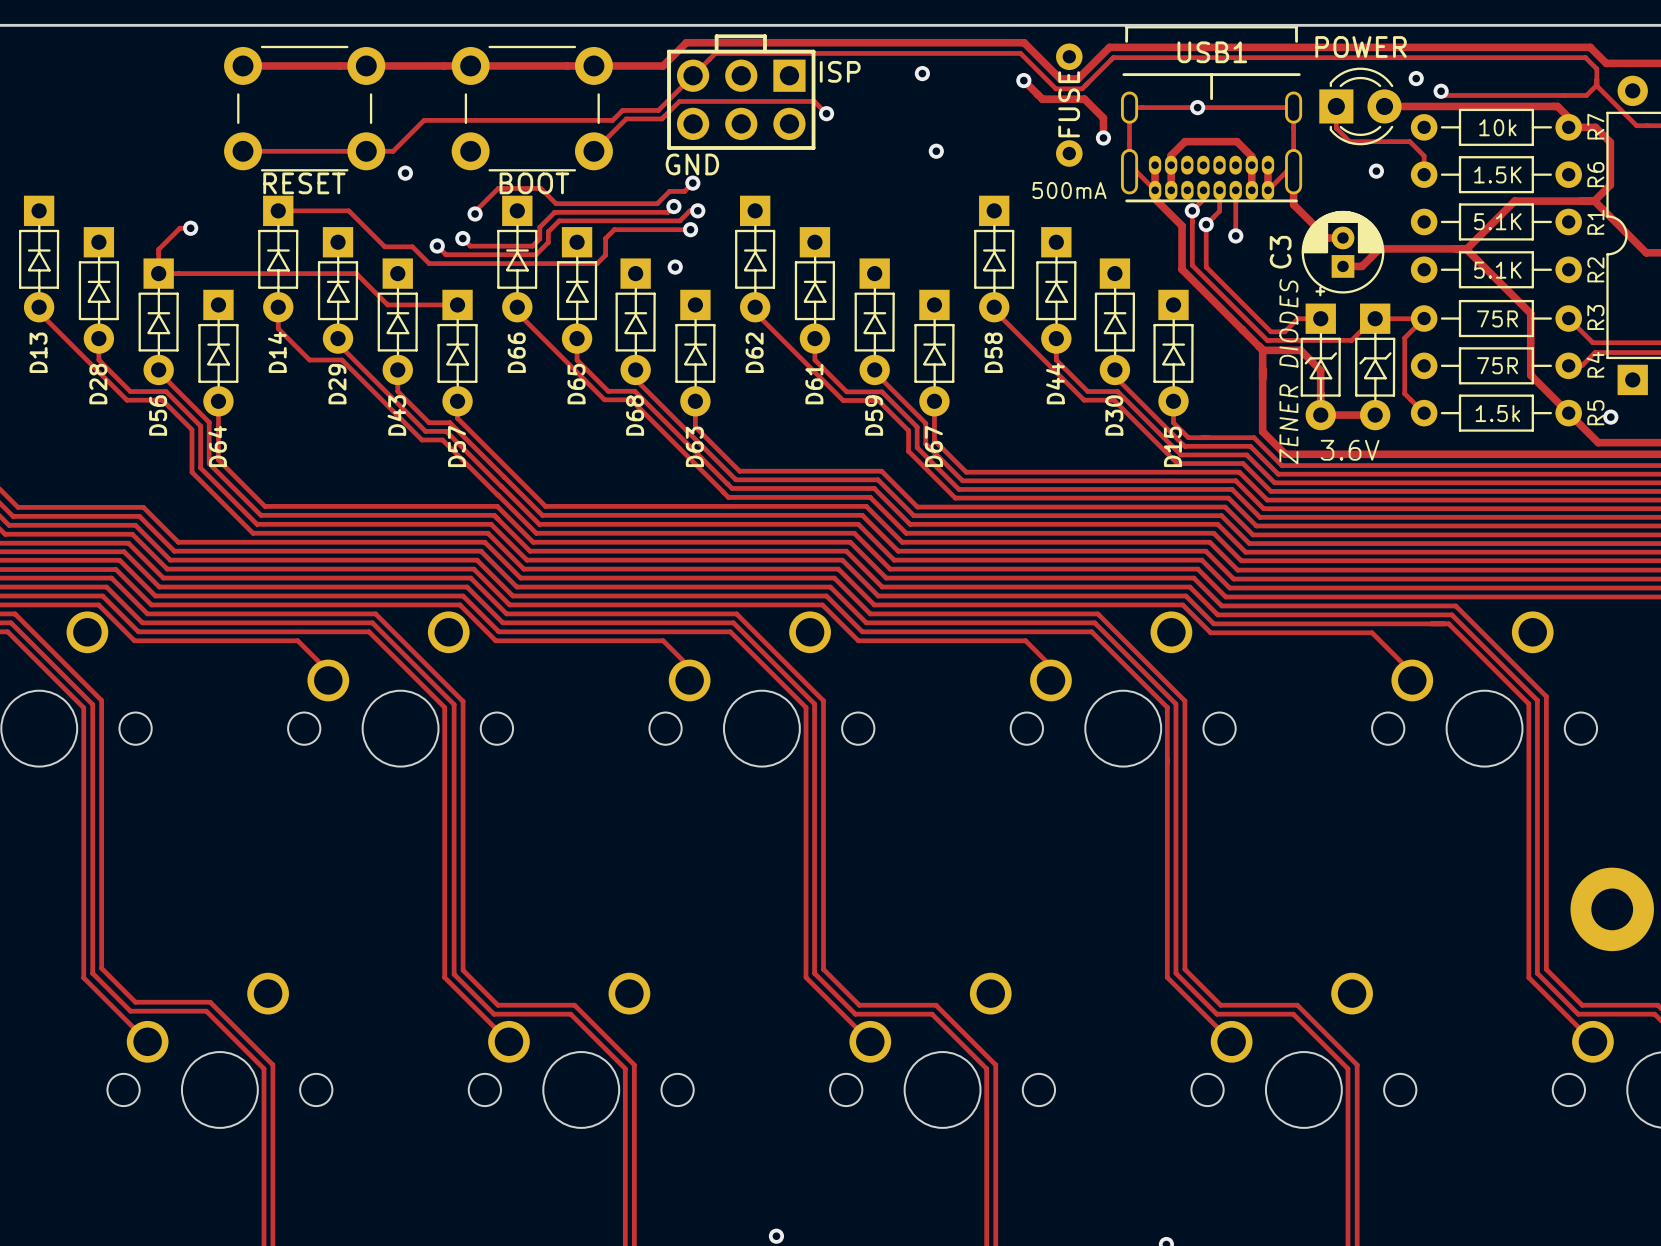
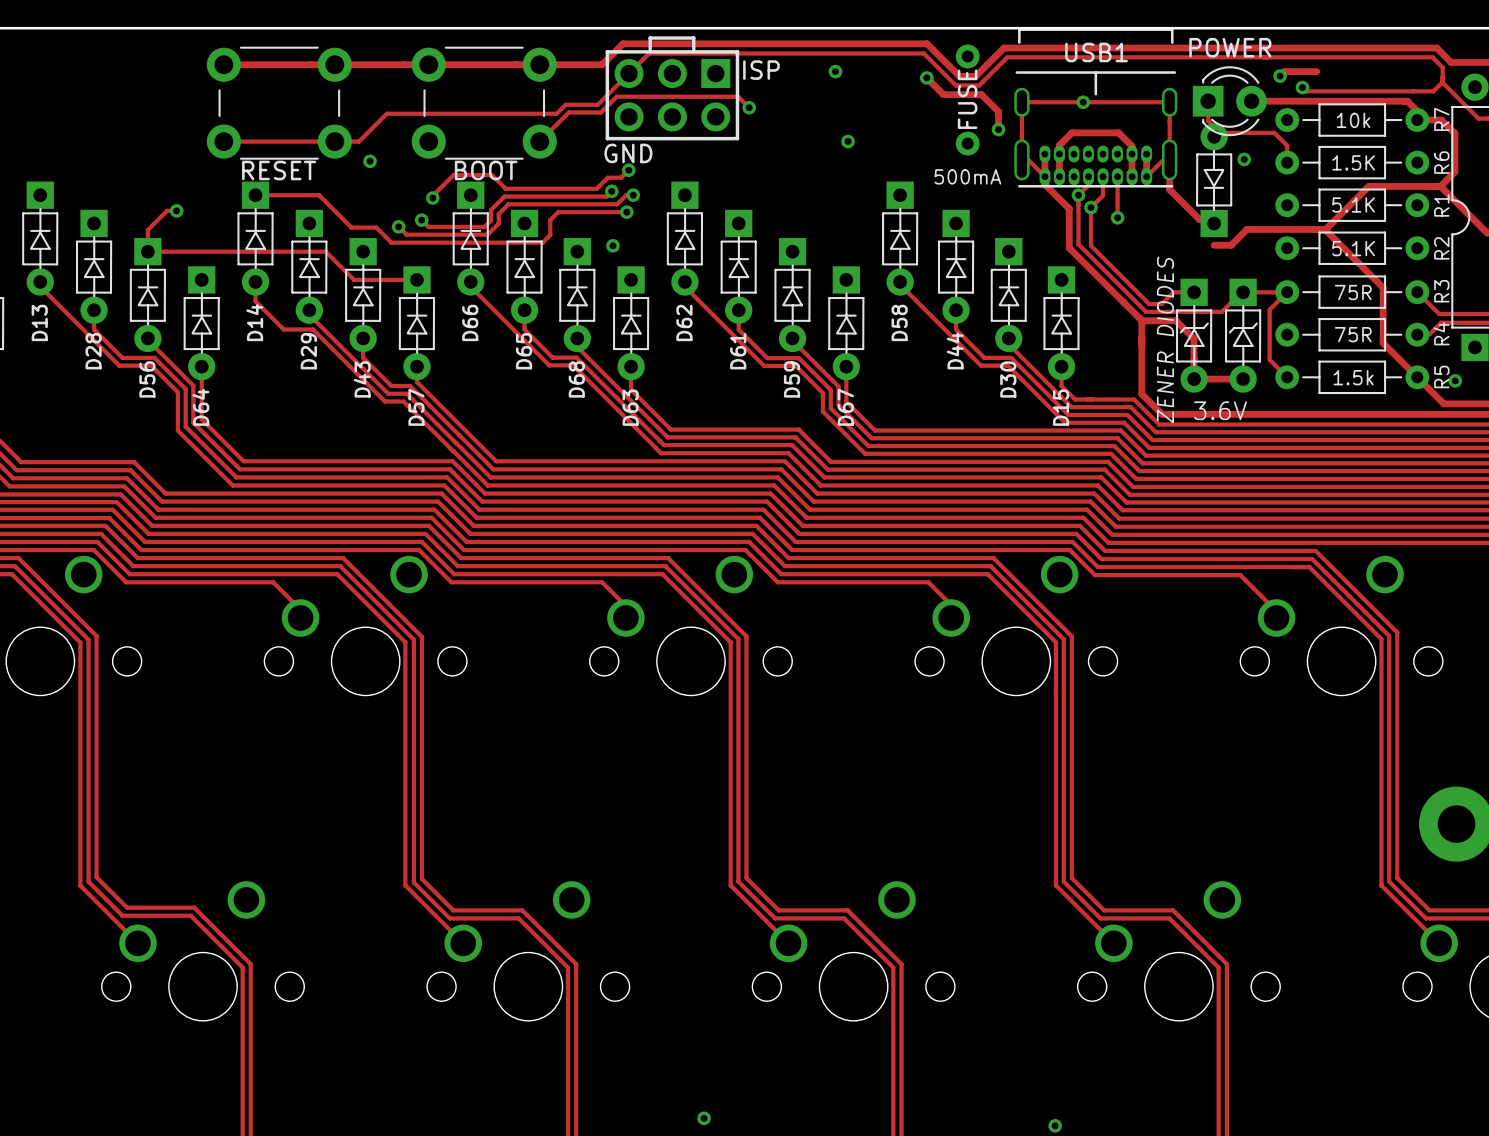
track: none -> (1316, 71) (1284, 71) (1280, 76)
part: none -> (1214, 180)
C3: (1342, 253) -> none

